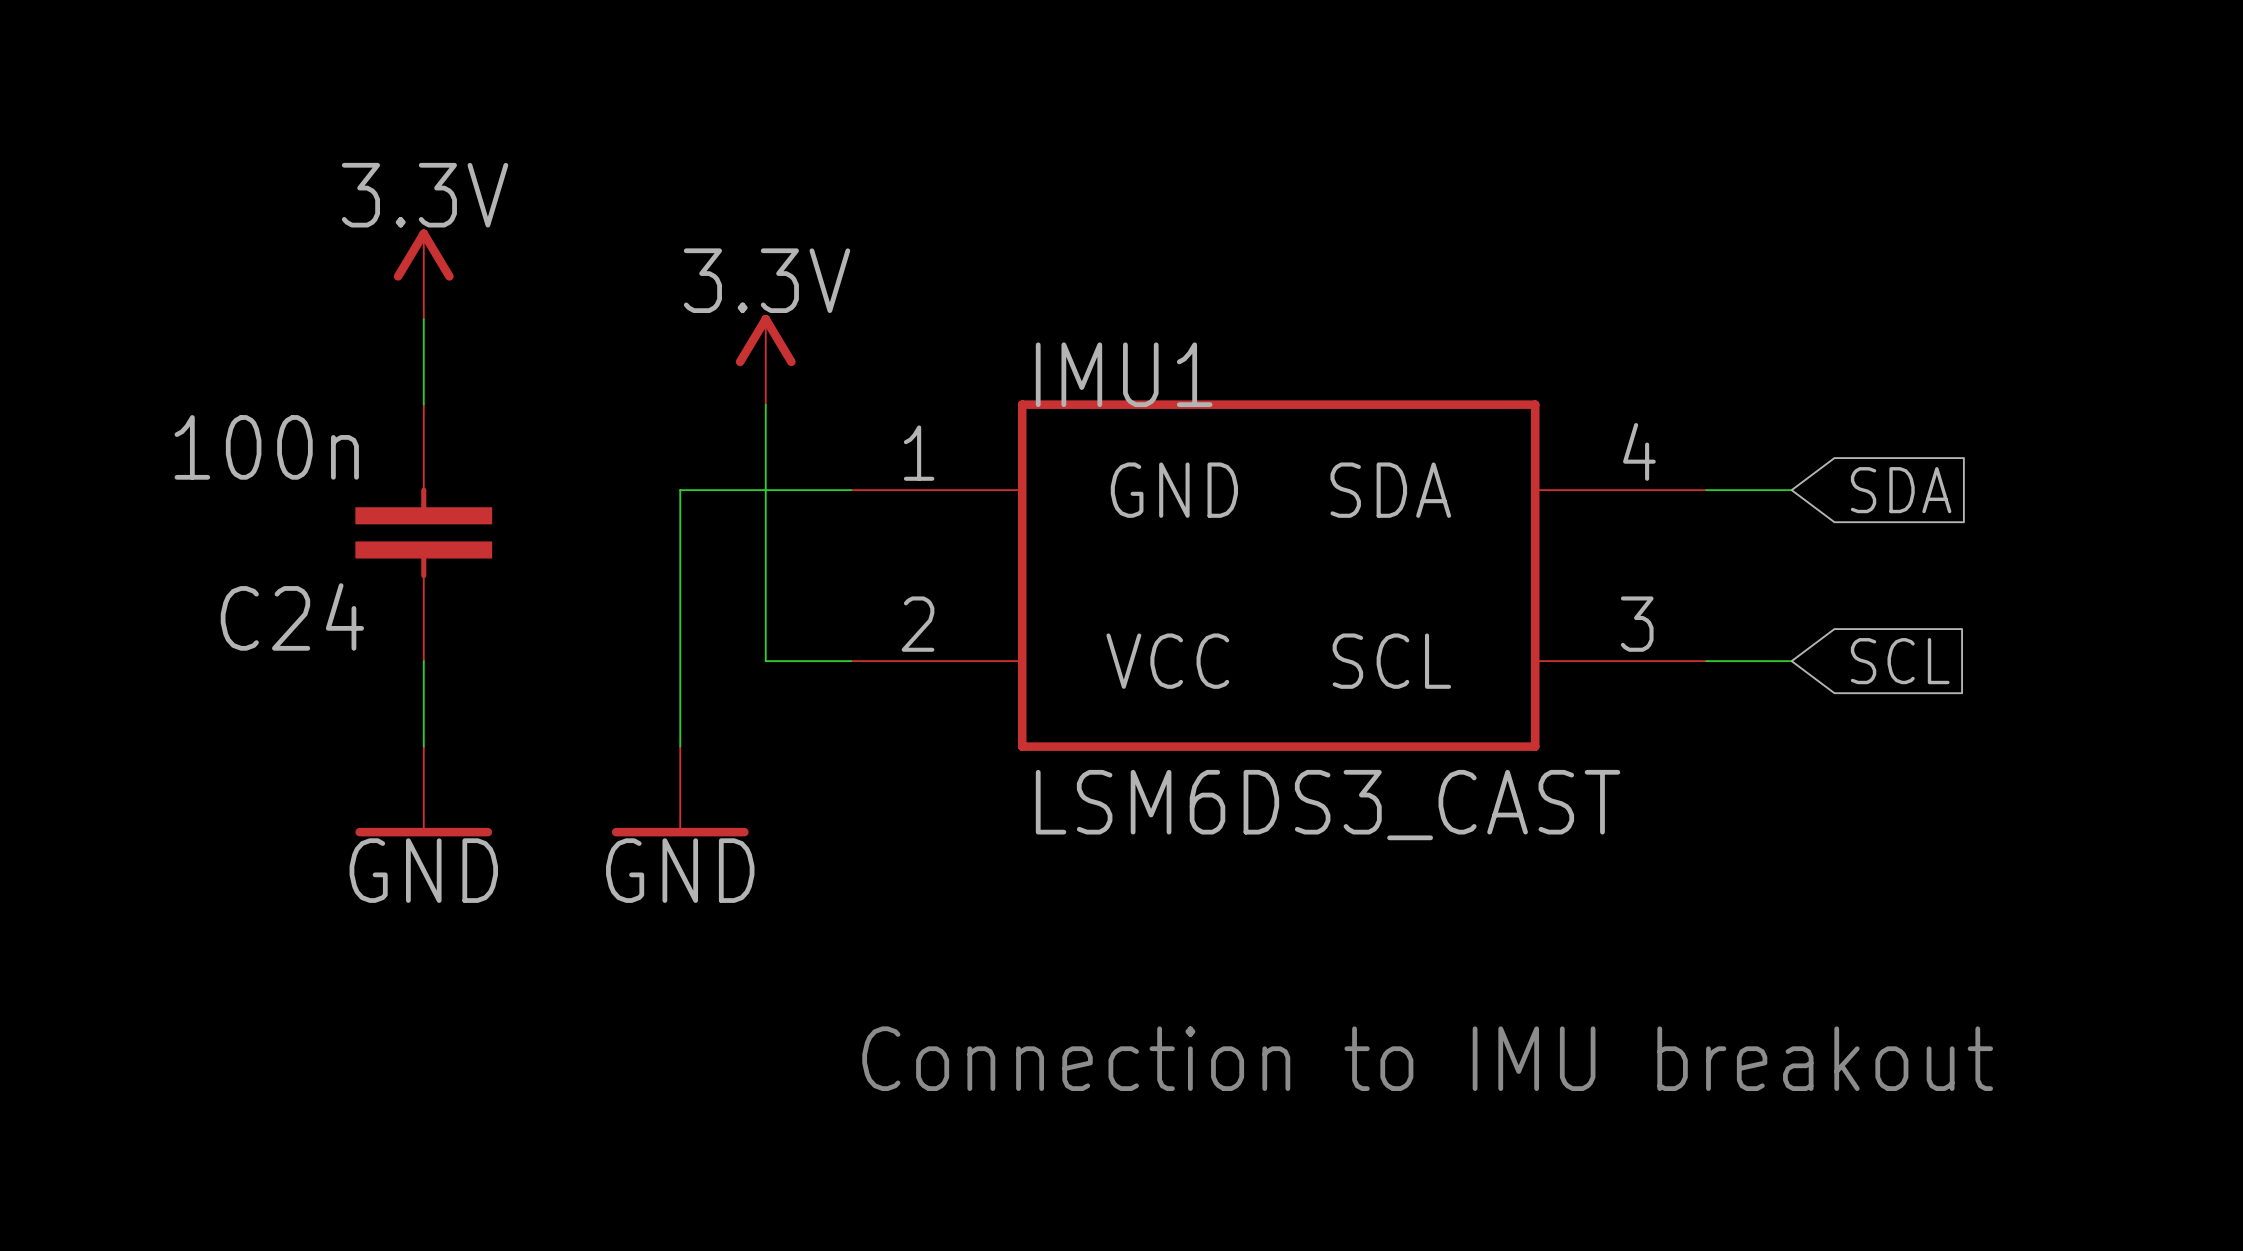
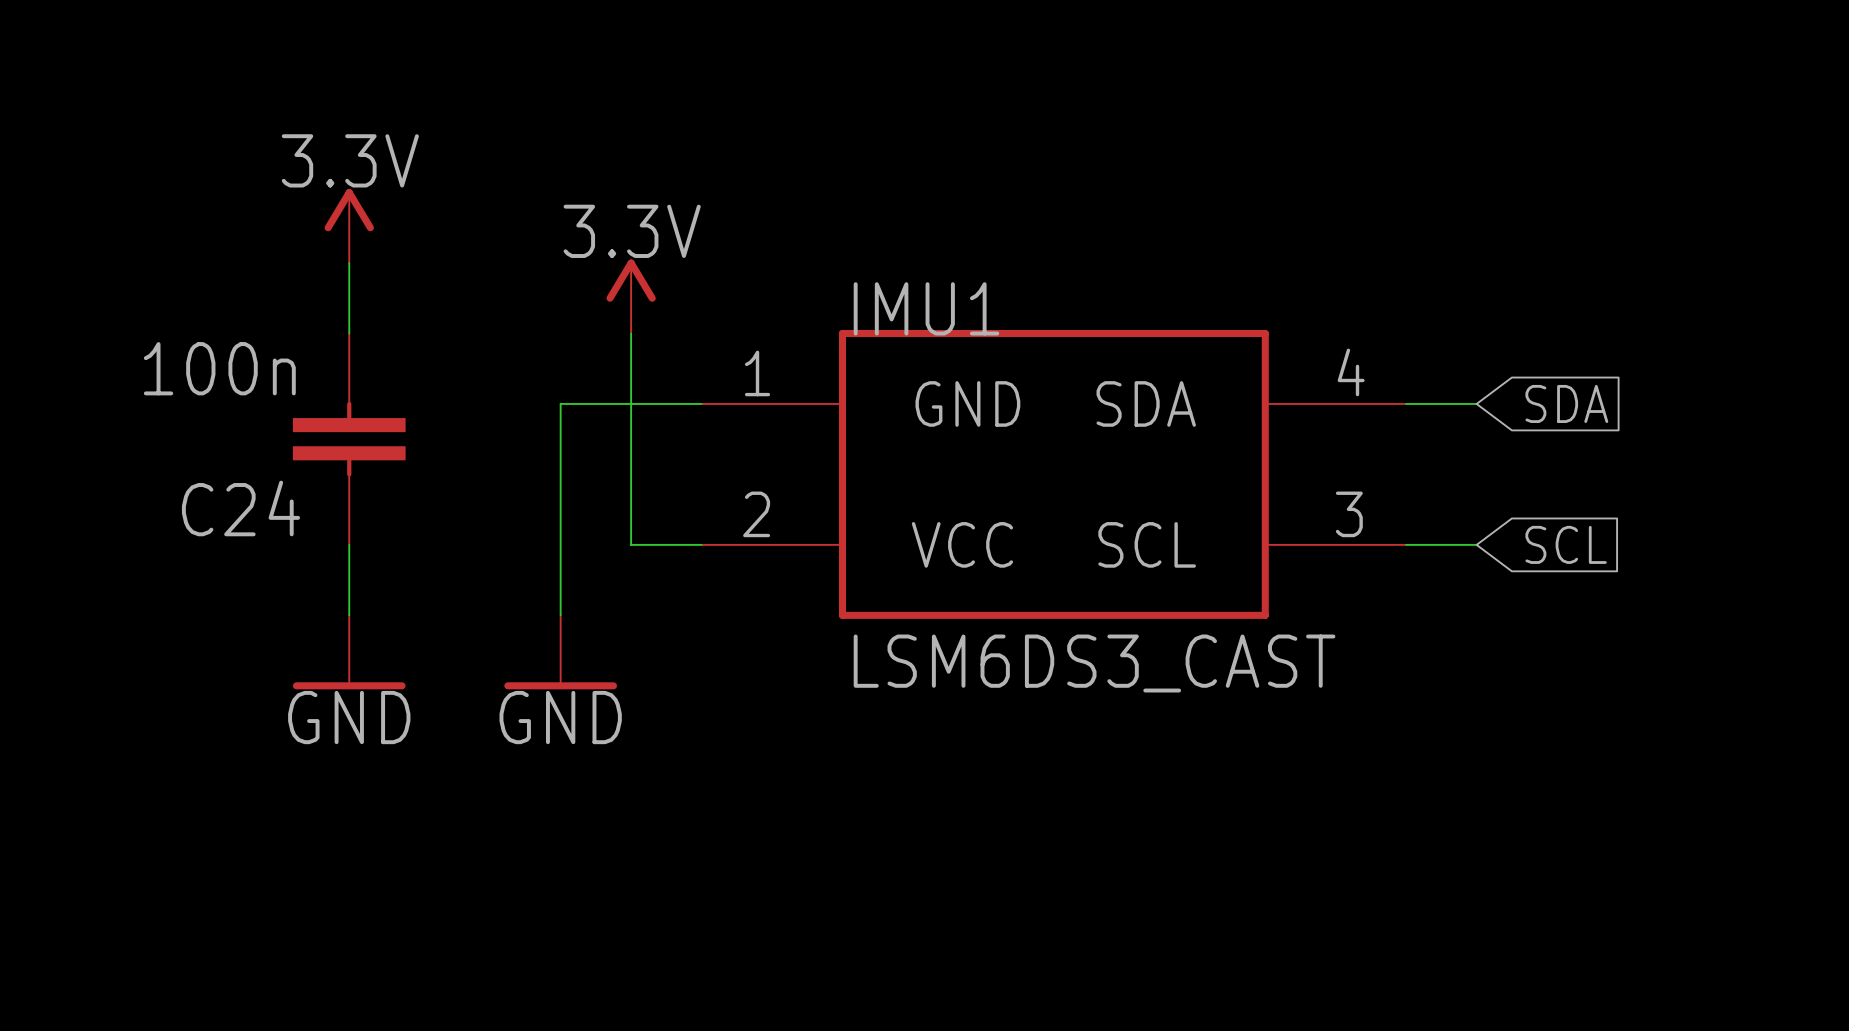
text: Connection to IMU breakout (1427, 1058) -> none

